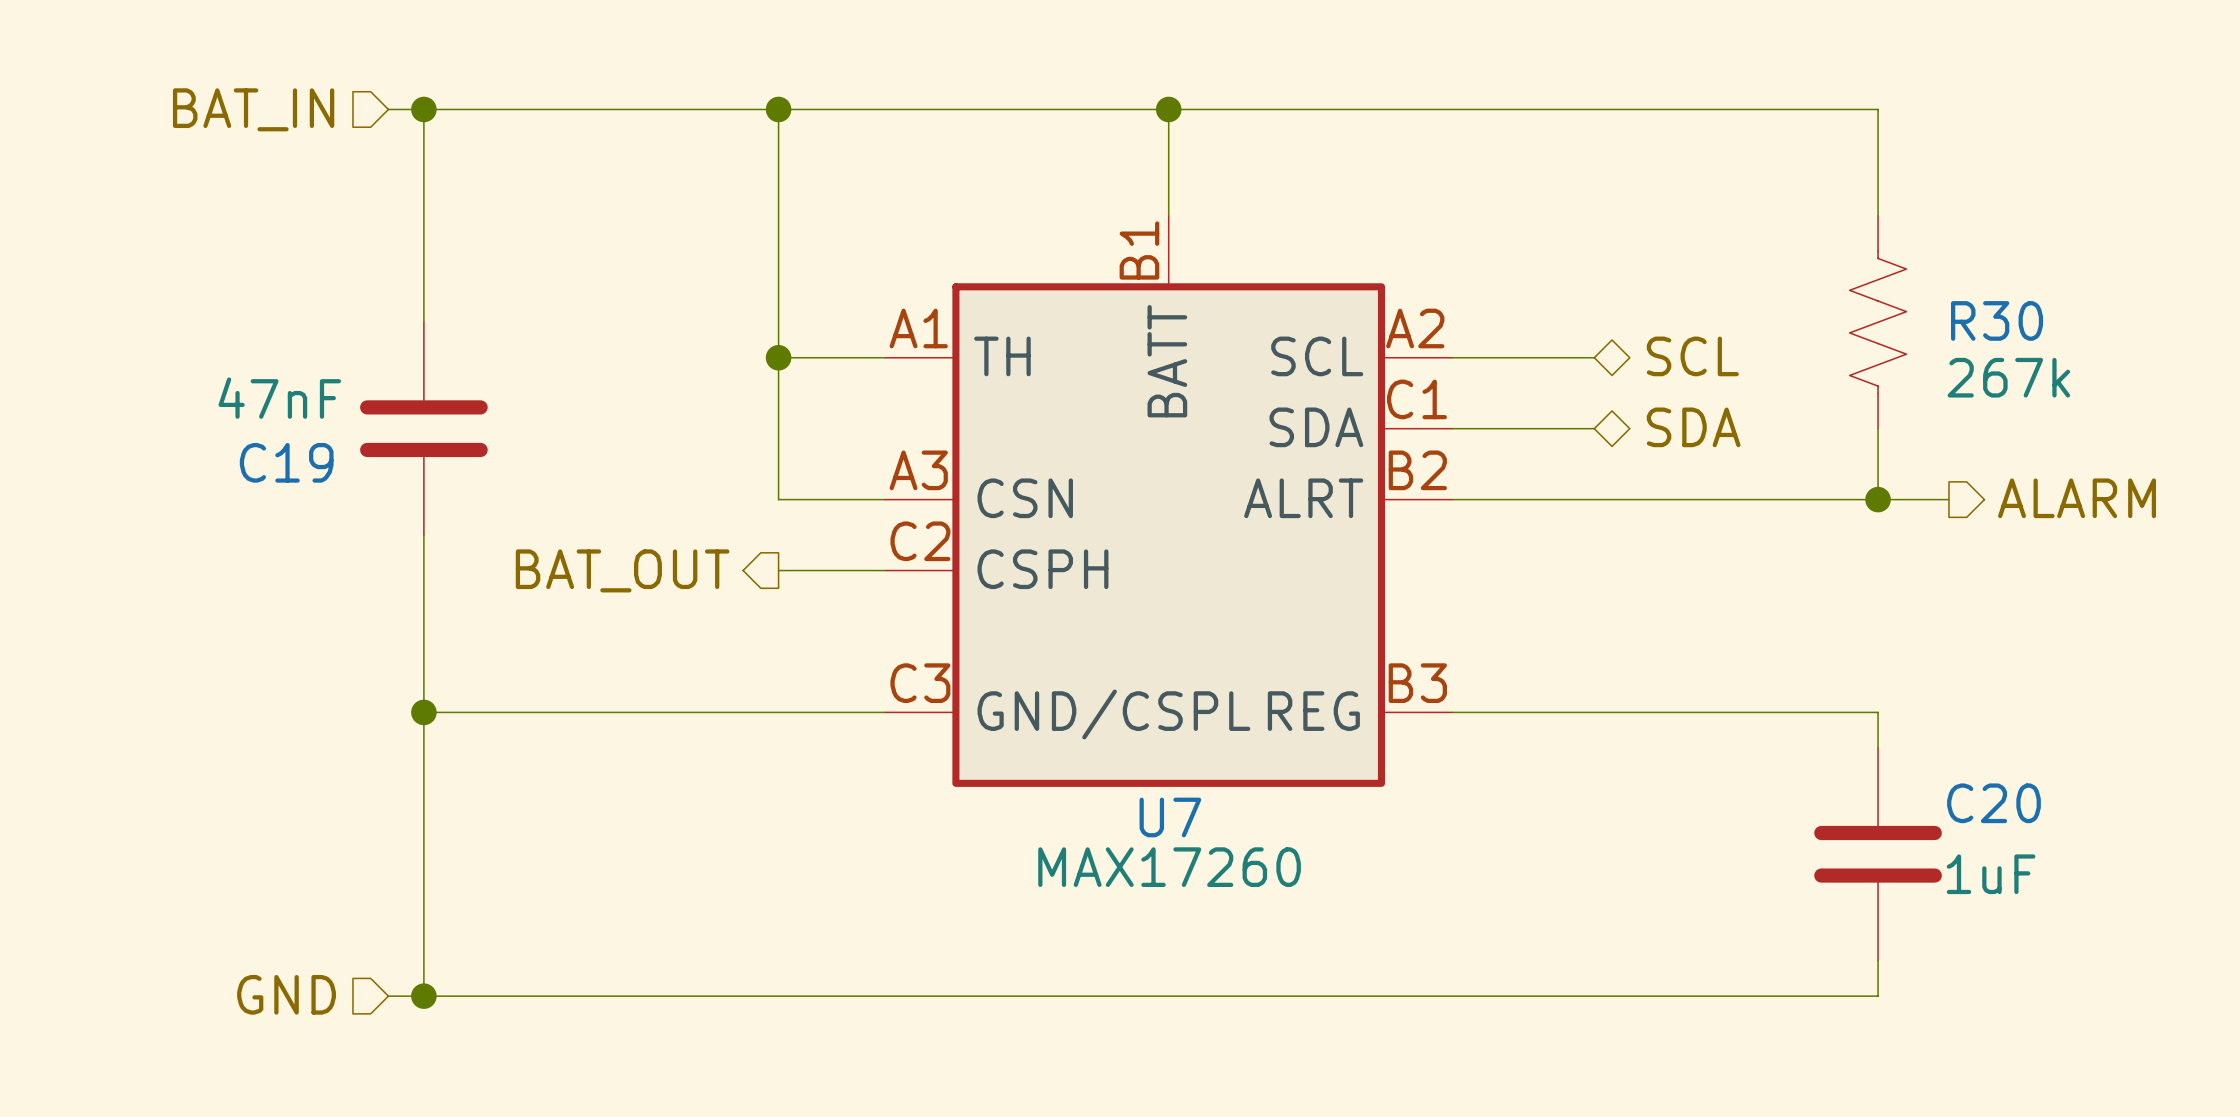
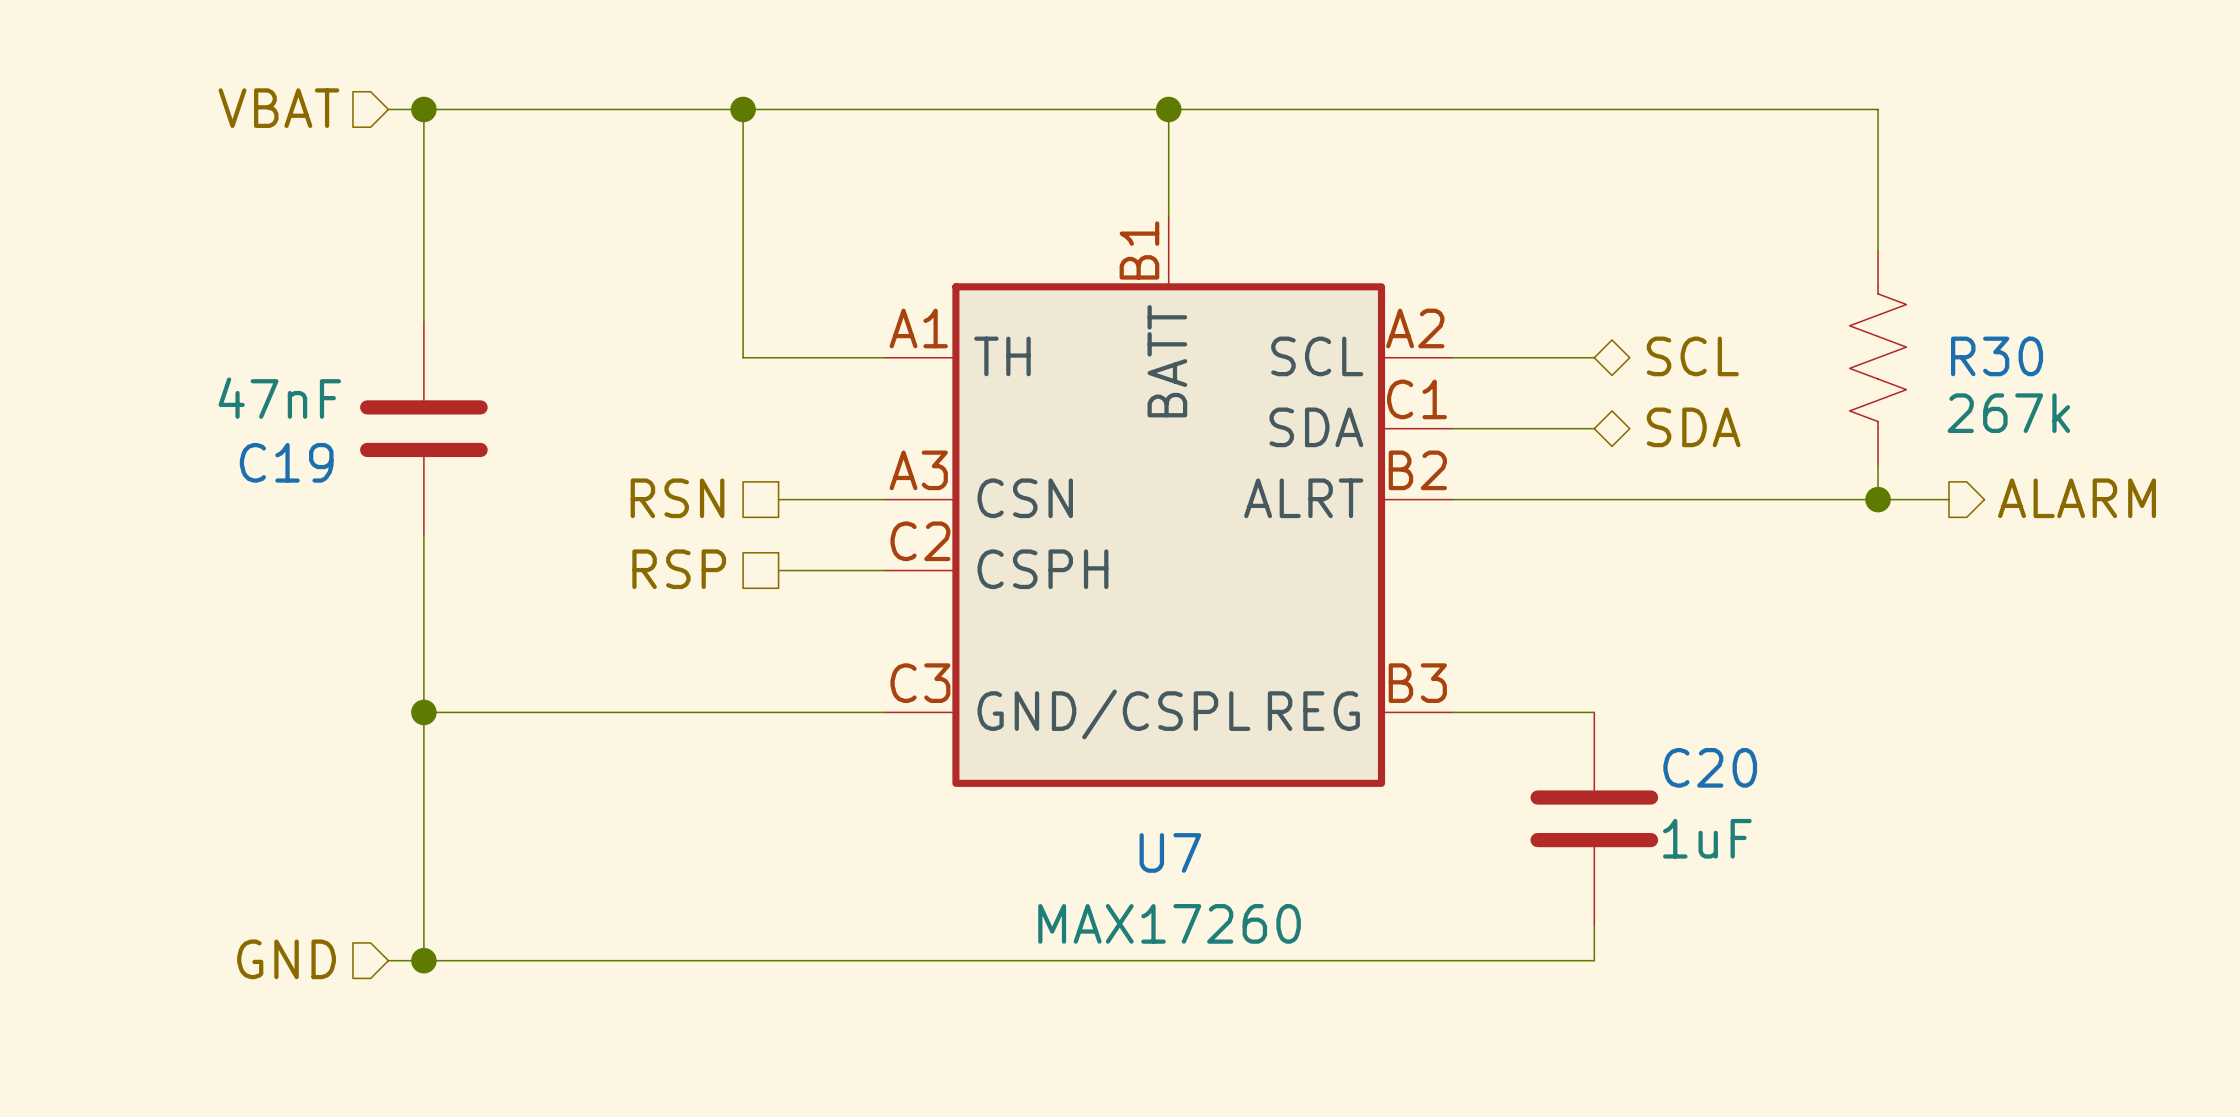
hierarchical label: BAT_IN (253, 109) -> VBAT (278, 108)
wire: none -> (743, 109) (743, 357) (778, 357)
wire: (778, 109) (778, 499) -> none
junction position: (778, 109) -> (743, 109)
R30 position: (1878, 322) -> (1878, 357)
junction: (778, 357) -> none
hierarchical label: none -> RSN (677, 498)
hierarchical label shape: output (622, 570) -> passive (679, 569)
hierarchical label: BAT_OUT (622, 570) -> RSP (679, 569)
wire: (1594, 712) (1878, 712) (1878, 747) -> none
U7 name position: U7 (1170, 817) -> U7 (1170, 852)
C20 position: (1878, 854) -> (1594, 818)
U7 value position: MAX17260 (1169, 867) -> MAX17260 (1169, 923)
wire: none -> (1594, 925) (1594, 960) (388, 960)
wire: (423, 960) (423, 996) -> none
wire: (1878, 960) (1878, 996) (388, 996) -> none
hierarchical label position: GND (286, 994) -> GND (286, 959)
junction position: (423, 996) -> (423, 960)

